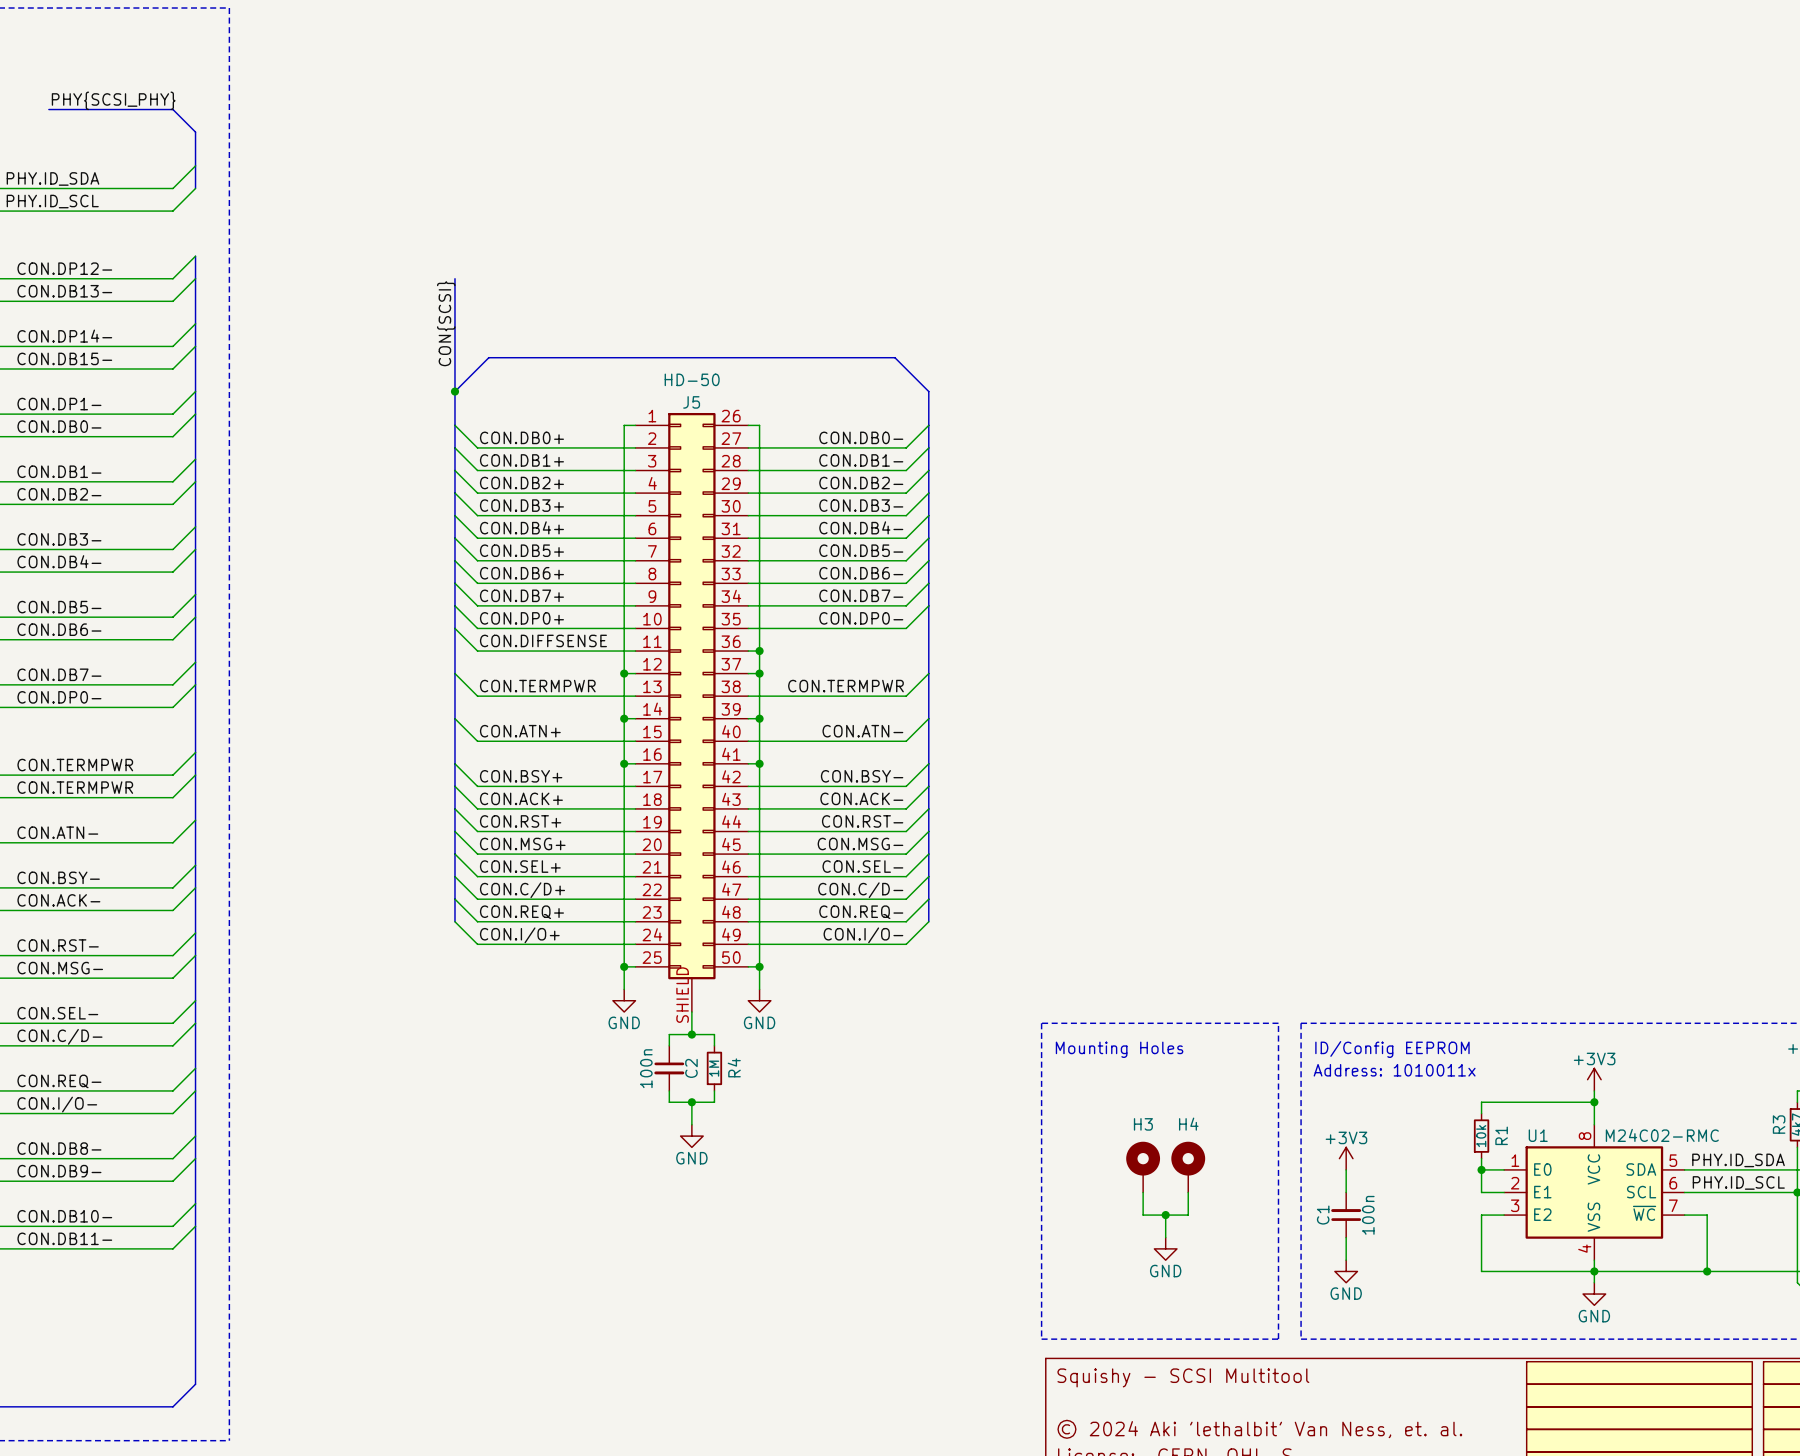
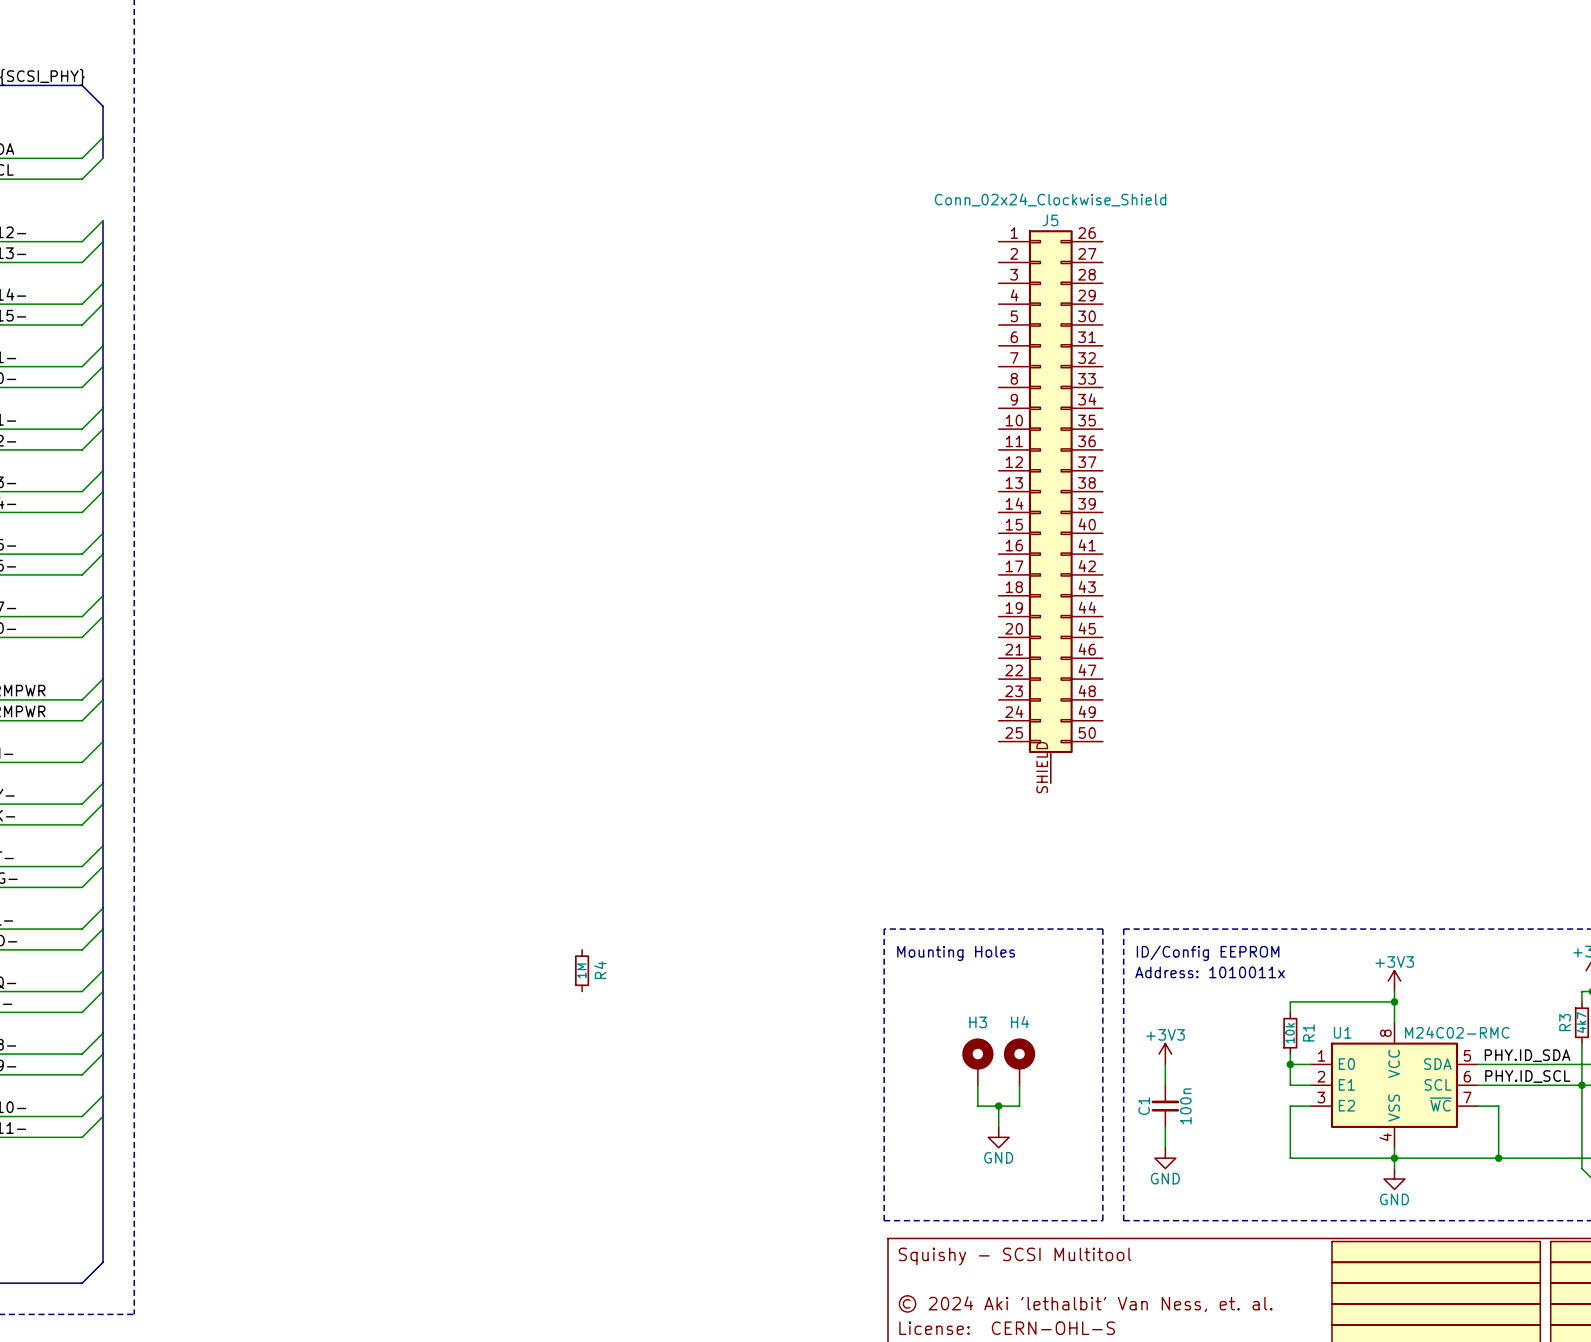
bus: (454, 278) (454, 921) -> none
label: CON{SCSI} (446, 323) -> none
J5 value: HD-50 (692, 379) -> Conn_02x24_Clockwise_Shield (1050, 199)
bus: (454, 391) (488, 357) (894, 357) (928, 391) (928, 921) -> none
junction: (454, 391) -> none
wire: (454, 425) (477, 447) (635, 447) -> none
wire: (635, 425) (624, 425) (624, 989) -> none
wire: (748, 425) (759, 425) (759, 989) -> none
wire: (928, 425) (906, 447) (748, 447) -> none
label: CON.DB0+ (521, 437) -> none
label: CON.DB0- (861, 437) -> none
wire: (454, 447) (477, 470) (635, 470) -> none
wire: (928, 447) (906, 470) (748, 470) -> none
label: CON.DB1+ (521, 460) -> none
label: CON.DB1- (861, 460) -> none
wire: (454, 470) (477, 493) (635, 493) -> none
wire: (928, 470) (906, 493) (748, 493) -> none
label: CON.DB2+ (521, 483) -> none
label: CON.DB2- (861, 483) -> none
wire: (454, 493) (477, 515) (635, 515) -> none
wire: (928, 493) (906, 515) (748, 515) -> none
label: CON.DB3+ (521, 505) -> none
label: CON.DB3- (861, 505) -> none
wire: (454, 515) (477, 538) (635, 538) -> none
wire: (928, 515) (906, 538) (748, 538) -> none
label: CON.DB4+ (521, 527) -> none
label: CON.DB4- (861, 527) -> none
wire: (454, 538) (477, 560) (635, 560) -> none
wire: (928, 538) (906, 560) (748, 560) -> none
label: CON.DB5+ (521, 550) -> none
label: CON.DB5- (861, 550) -> none
wire: (454, 560) (477, 583) (635, 583) -> none
wire: (928, 560) (906, 583) (748, 583) -> none
label: CON.DB6+ (521, 573) -> none
label: CON.DB6- (861, 573) -> none
wire: (454, 583) (477, 605) (635, 605) -> none
wire: (928, 583) (906, 605) (748, 605) -> none
label: CON.DB7+ (521, 595) -> none
label: CON.DB7- (861, 595) -> none
wire: (454, 605) (477, 628) (635, 628) -> none
wire: (928, 605) (906, 628) (748, 628) -> none
label: CON.DP0+ (521, 618) -> none
label: CON.DP0- (861, 618) -> none
wire: (454, 628) (477, 651) (635, 651) -> none
label: CON.DIFFSENSE (543, 640) -> none
wire: (748, 651) (759, 651) -> none
junction: (759, 651) -> none
wire: (454, 673) (477, 696) (635, 696) -> none
wire: (624, 673) (635, 673) -> none
junction: (624, 673) -> none
wire: (748, 673) (759, 673) -> none
junction: (759, 673) -> none
wire: (928, 673) (906, 696) (748, 696) -> none
label: CON.TERMPWR (537, 686) -> none
label: CON.TERMPWR (845, 686) -> none
J5 position: (691, 712) -> (1050, 506)
wire: (454, 718) (477, 741) (635, 741) -> none
wire: (624, 718) (635, 718) -> none
junction: (624, 718) -> none
wire: (748, 718) (759, 718) -> none
junction: (759, 718) -> none
wire: (928, 718) (906, 741) (748, 741) -> none
label: CON.ATN+ (520, 731) -> none
label: CON.ATN- (862, 731) -> none
wire: (454, 763) (477, 786) (635, 786) -> none
wire: (624, 763) (635, 763) -> none
junction: (624, 763) -> none
wire: (748, 763) (759, 763) -> none
junction: (759, 763) -> none
wire: (928, 763) (906, 786) (748, 786) -> none
label: CON.BSY+ (521, 776) -> none
label: CON.BSY- (862, 776) -> none
wire: (454, 786) (477, 808) (635, 808) -> none
wire: (928, 786) (906, 808) (748, 808) -> none
label: CON.ACK+ (521, 798) -> none
label: CON.ACK- (861, 798) -> none
wire: (454, 808) (477, 831) (635, 831) -> none
wire: (928, 808) (906, 831) (748, 831) -> none
label: CON.RST+ (520, 821) -> none
label: CON.RST- (862, 821) -> none
wire: (454, 831) (477, 854) (635, 854) -> none
wire: (928, 831) (906, 854) (748, 854) -> none
label: CON.MSG+ (522, 844) -> none
label: CON.MSG- (860, 844) -> none
wire: (454, 854) (477, 876) (635, 876) -> none
wire: (928, 854) (906, 876) (748, 876) -> none
label: CON.SEL+ (520, 866) -> none
label: CON.SEL- (862, 866) -> none
wire: (454, 876) (477, 899) (635, 899) -> none
wire: (928, 876) (906, 899) (748, 899) -> none
label: CON.C/D+ (522, 890) -> none
label: CON.C/D- (860, 890) -> none
wire: (454, 899) (477, 921) (635, 921) -> none
wire: (928, 899) (906, 921) (748, 921) -> none
label: CON.REQ+ (521, 912) -> none
label: CON.REQ- (861, 912) -> none
wire: (454, 921) (477, 944) (635, 944) -> none
wire: (928, 921) (906, 944) (748, 944) -> none
label: CON.I/O+ (519, 935) -> none
label: CON.I/O- (863, 935) -> none
wire: (624, 966) (635, 966) -> none
junction: (624, 966) -> none
wire: (748, 966) (759, 966) -> none
junction: (759, 966) -> none
power symbol: GND (624, 1000) -> none
power symbol: GND (759, 1000) -> none
wire: (691, 1012) (691, 1034) -> none
junction: (691, 1034) -> none
wire: (669, 1045) (669, 1034) (714, 1034) (714, 1045) -> none
C2: 100n (669, 1068) -> none
wire: (669, 1090) (669, 1102) (714, 1102) (714, 1090) -> none
wire: (691, 1102) (691, 1124) -> none
junction: (691, 1102) -> none
power symbol: GND (691, 1136) -> none

